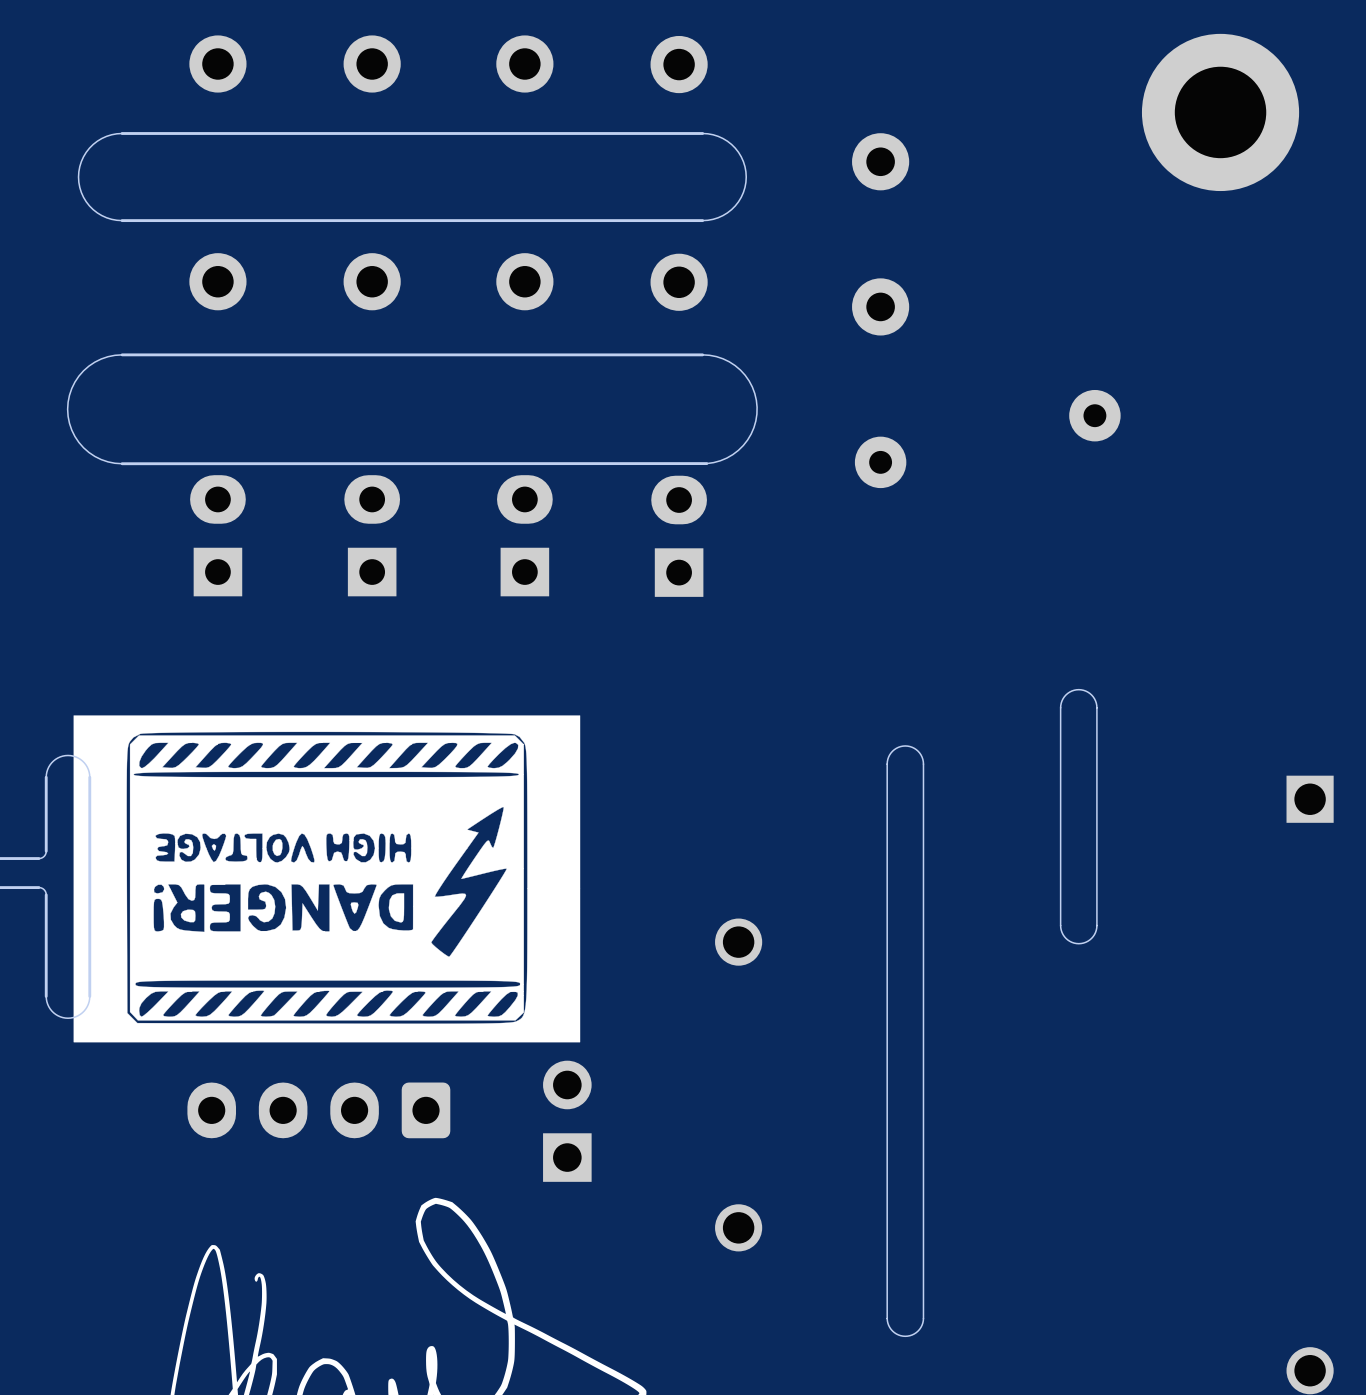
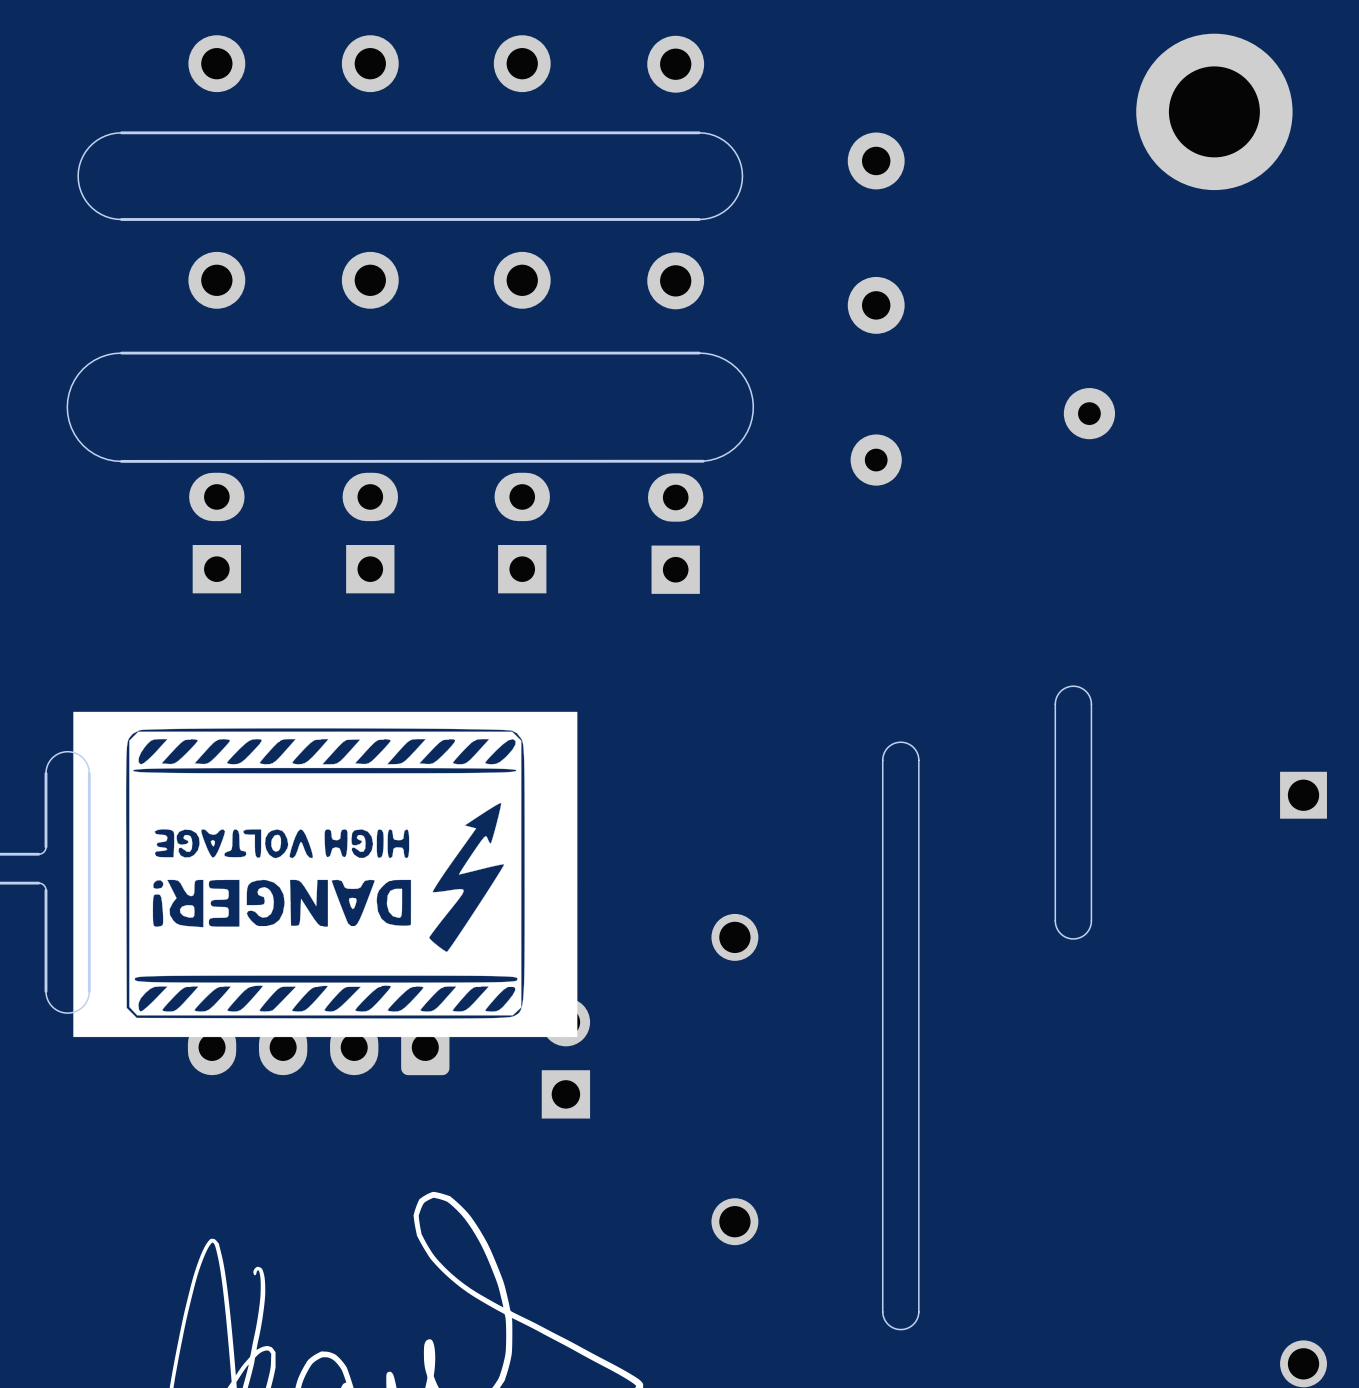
part position: (318, 1110) -> (318, 1047)
part position: (567, 1121) -> (565, 1058)

